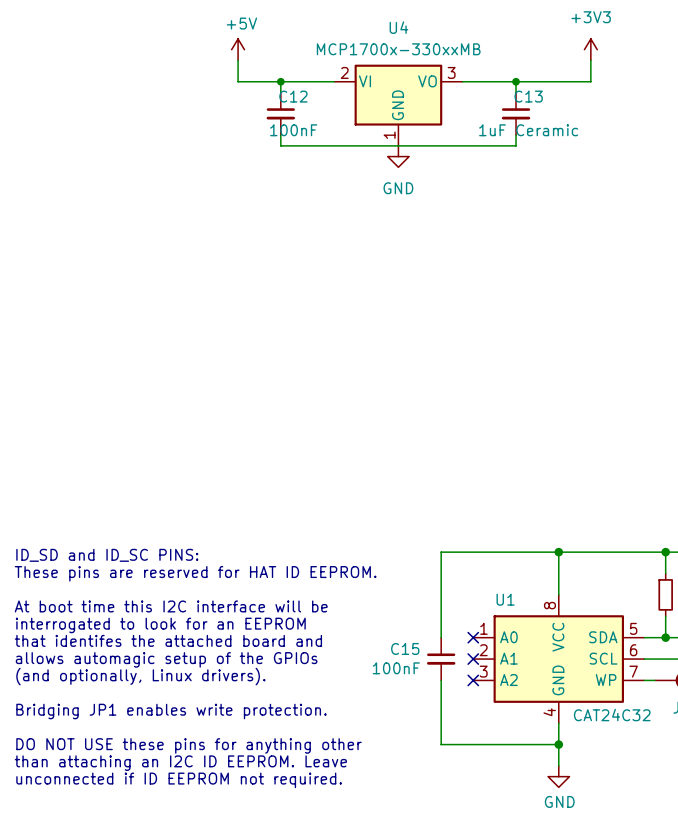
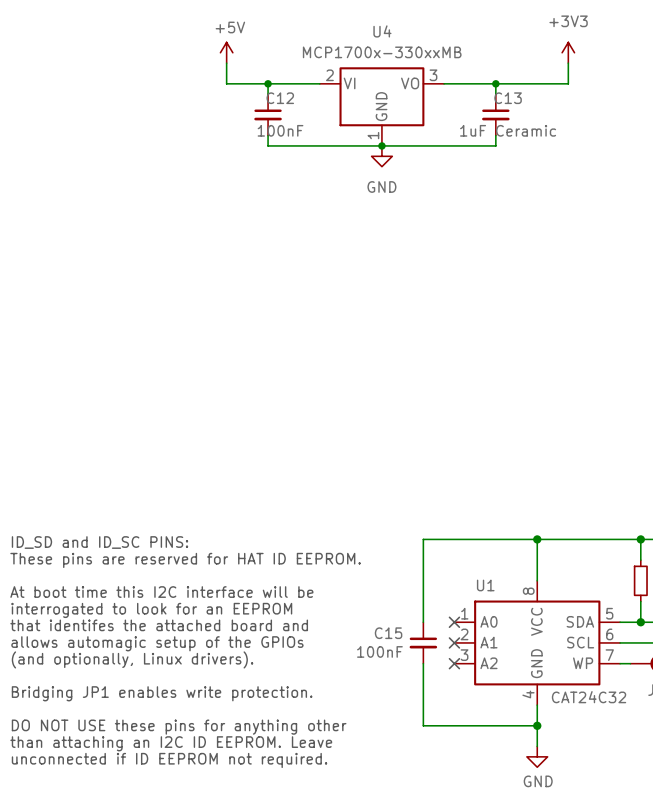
junction: none -> (381, 145)

